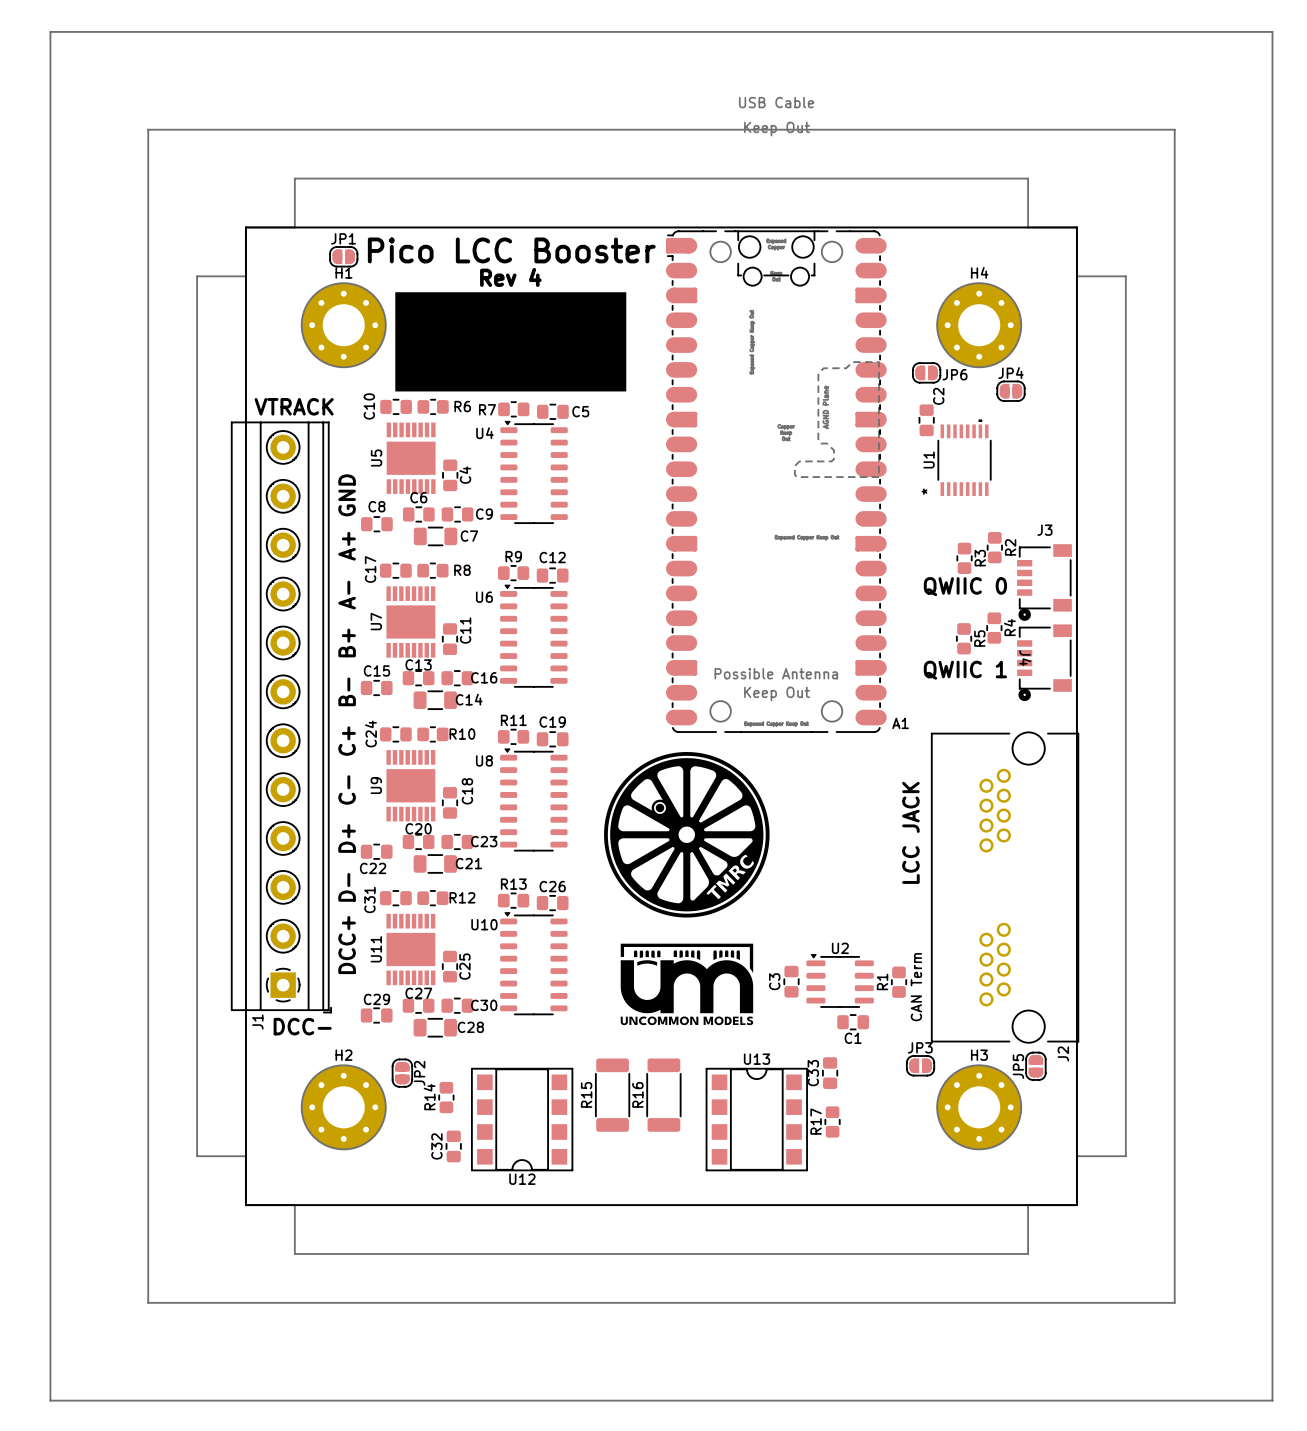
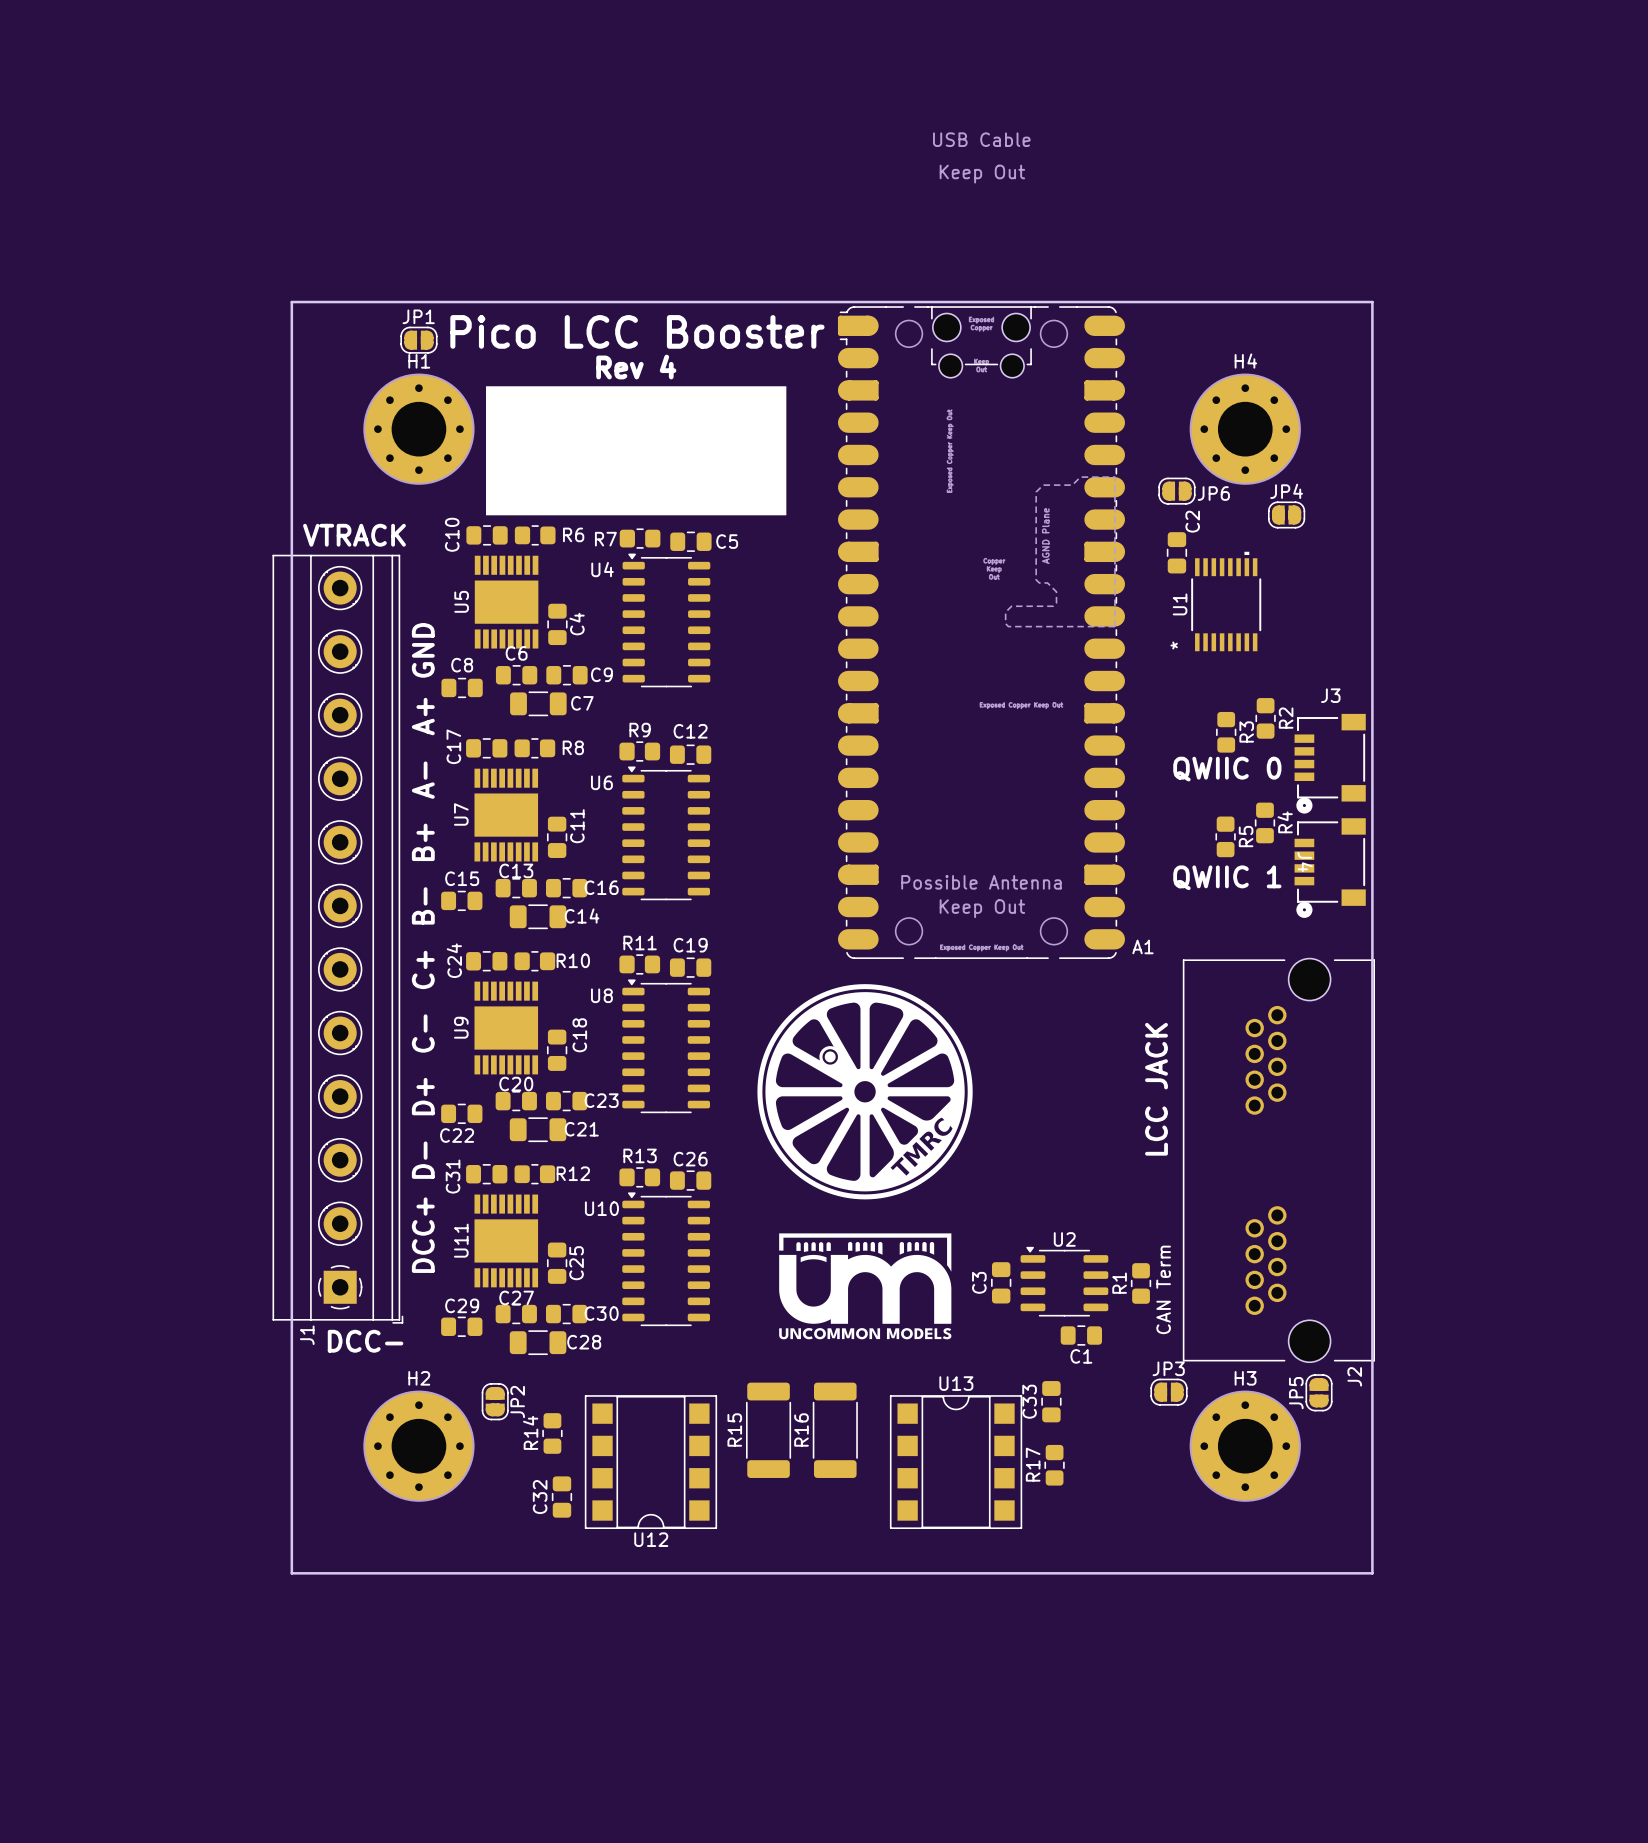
line: (50, 31) (1272, 31) (1272, 1400) (50, 1400) (50, 31) -> none
line: (148, 129) (1174, 129) (1174, 1302) (148, 1302) (148, 129) -> none
line: (294, 178) (294, 227) (245, 227) (245, 276) (197, 276) (197, 1156) (245, 1156) (245, 1205) (294, 1205) (294, 1253) (1028, 1253) (1028, 1205) (1076, 1205) (1076, 1156) (1125, 1156) (1125, 276) (1076, 276) (1076, 227) (1028, 227) (1028, 178) (294, 178) -> none

